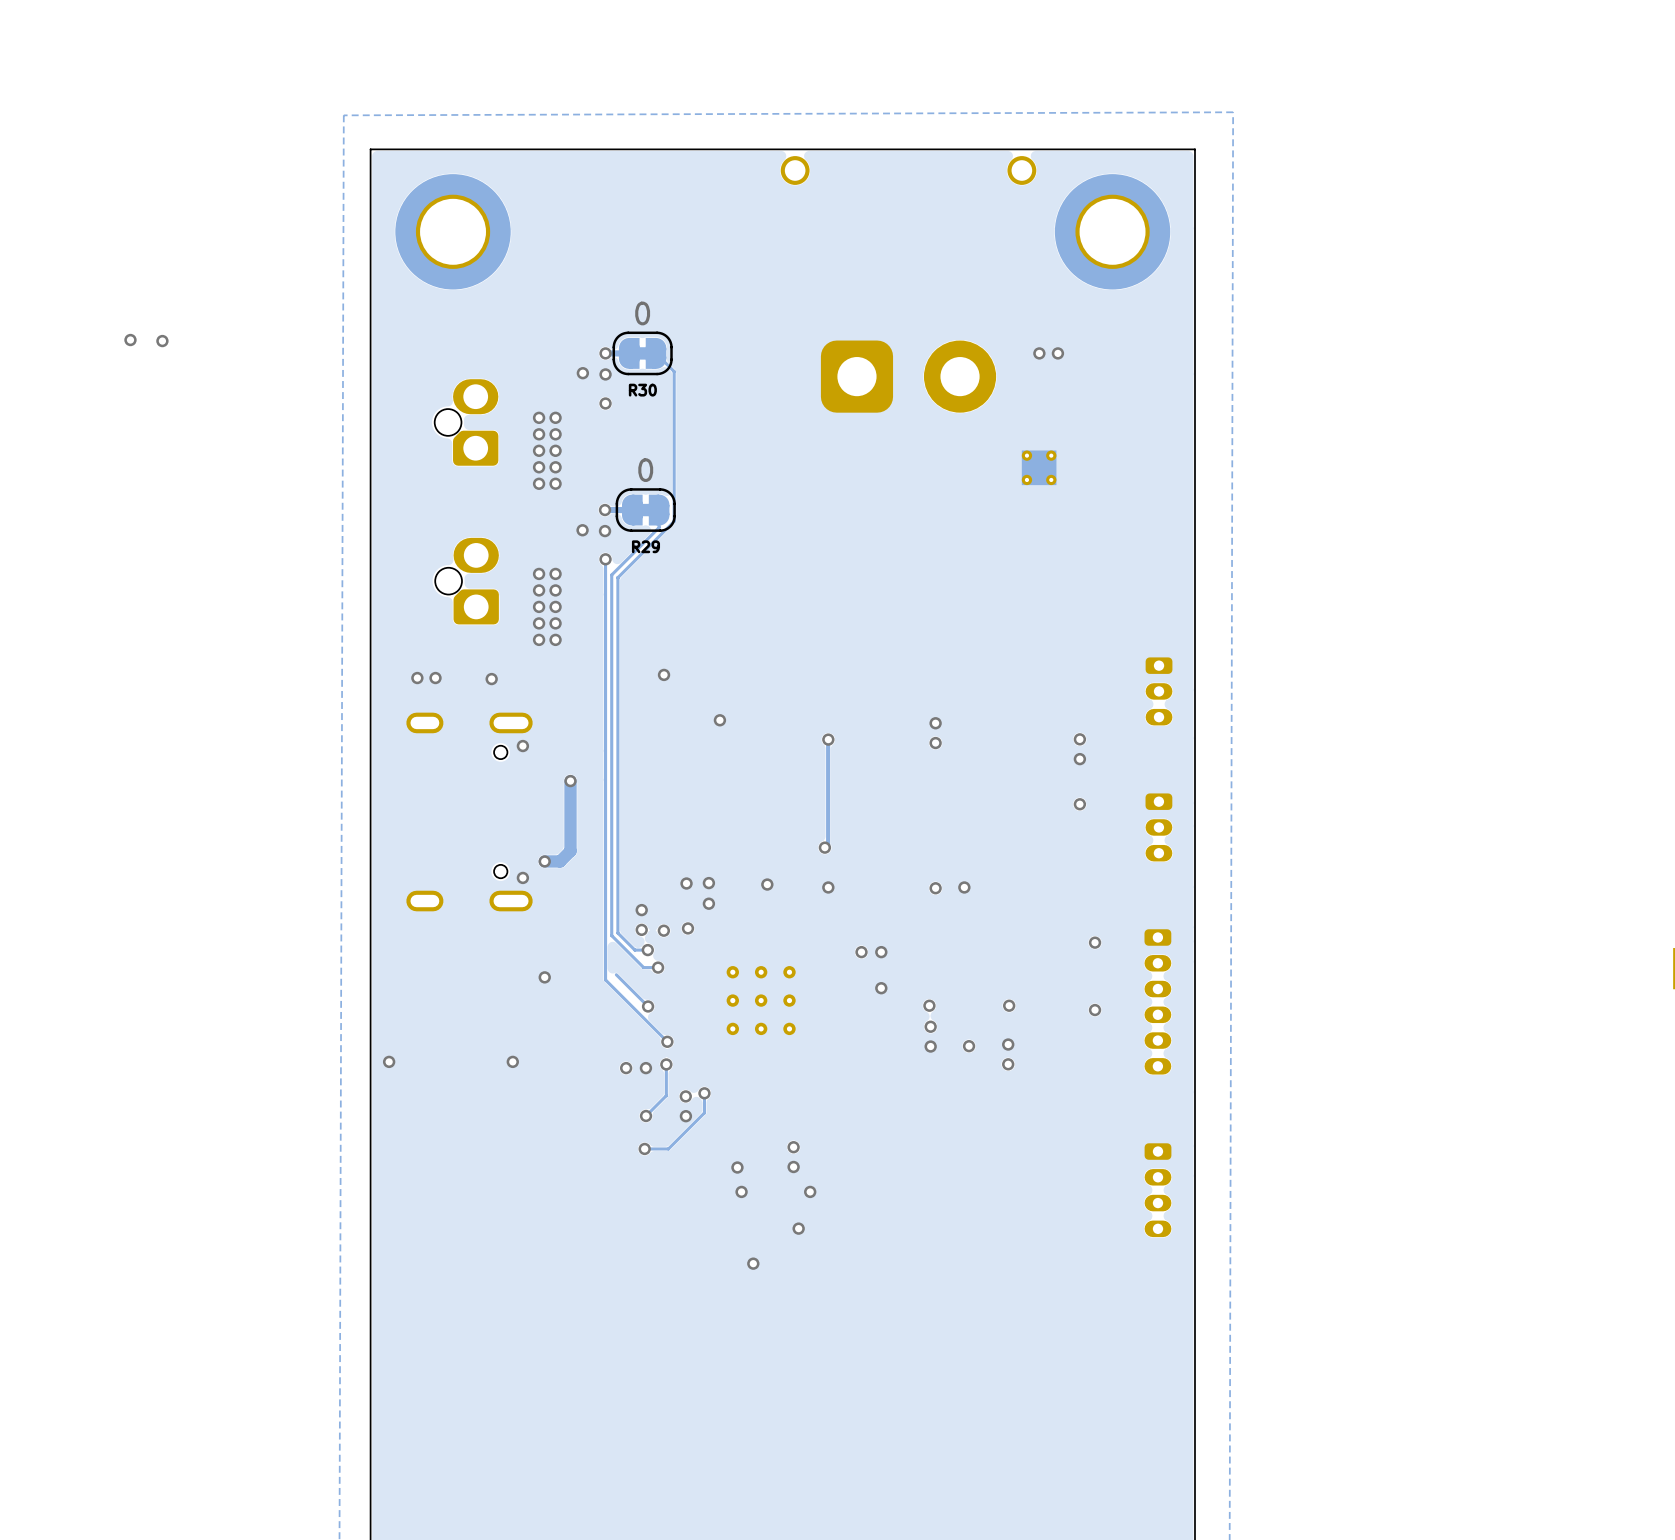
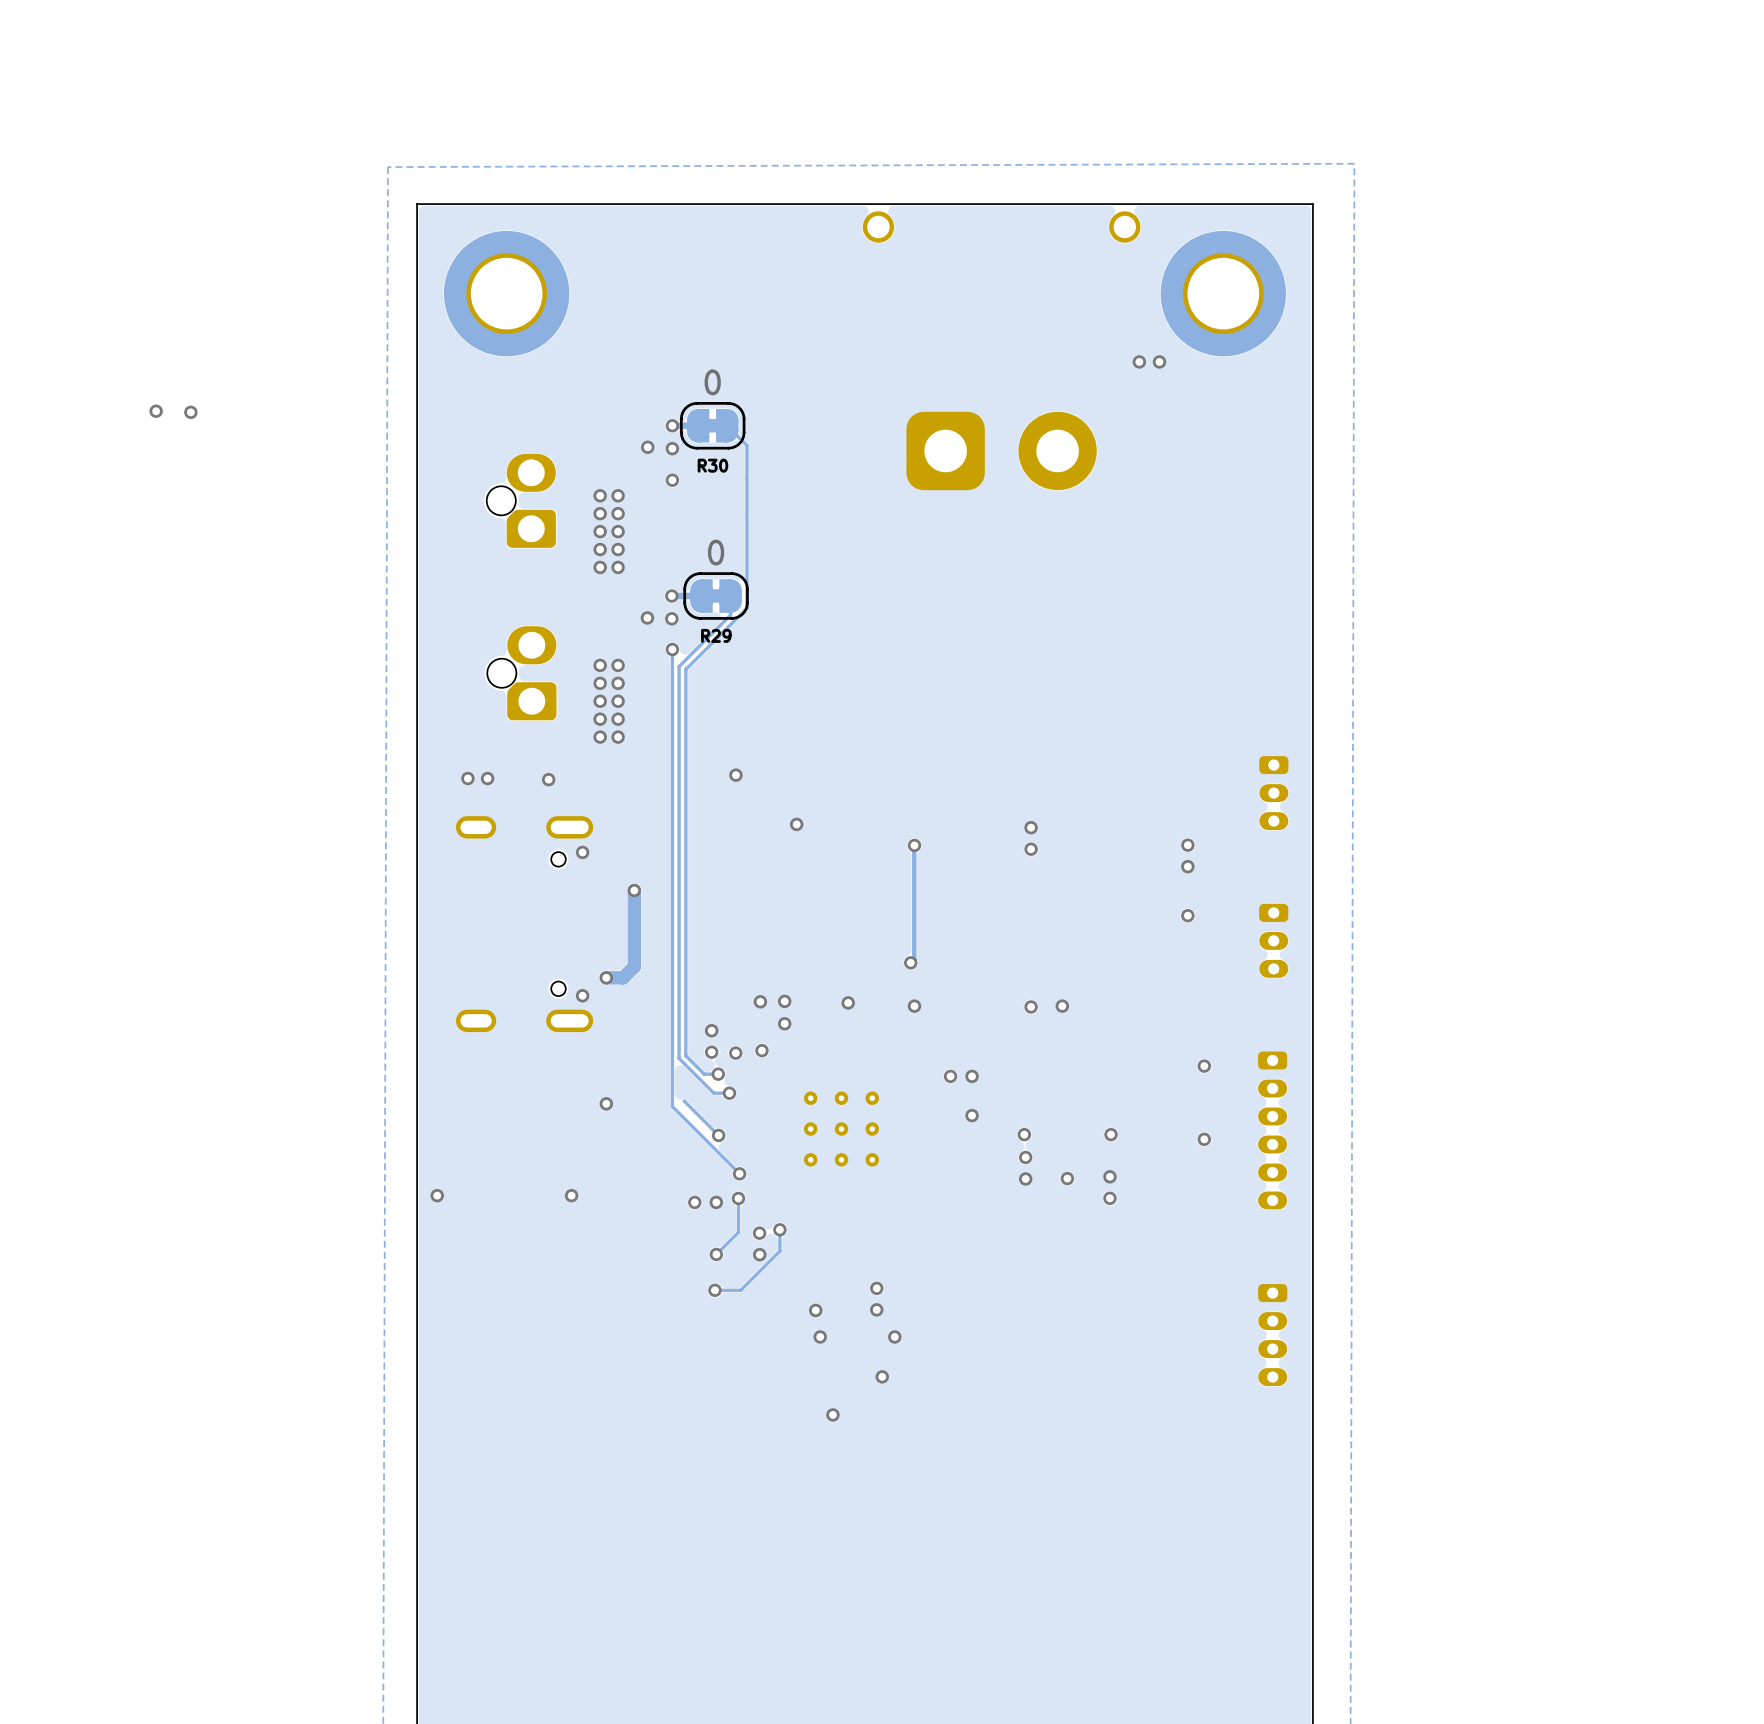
via: none -> (1139, 361)
via: none -> (1159, 361)
via: (1039, 353) -> none
via: (1057, 353) -> none
part: (1039, 467) -> none

